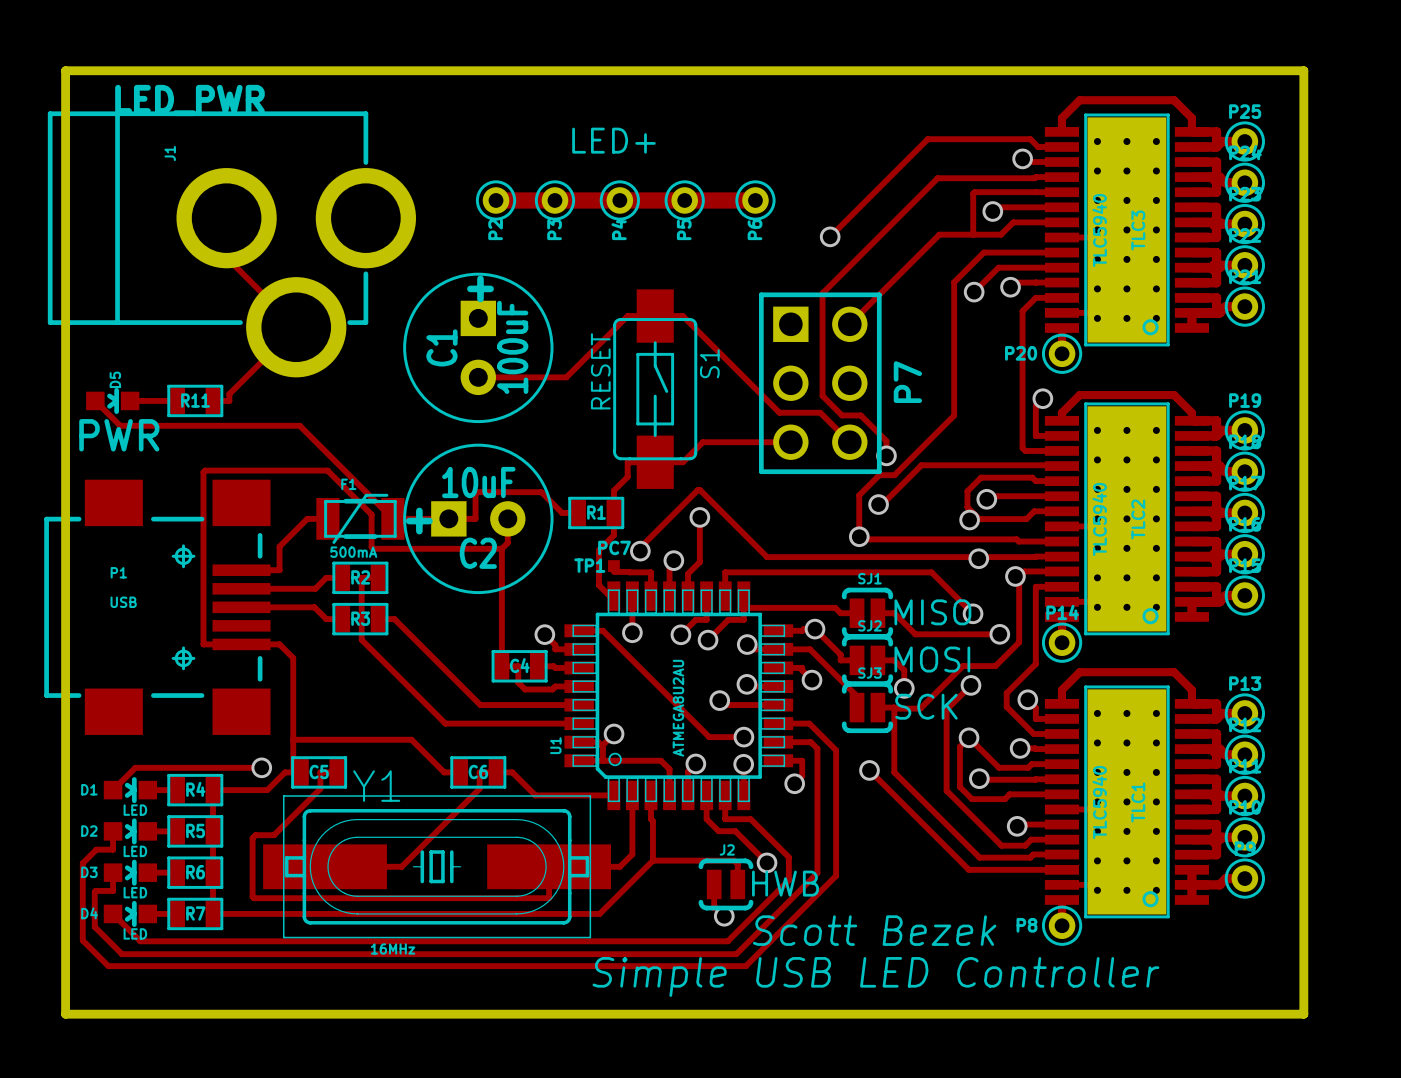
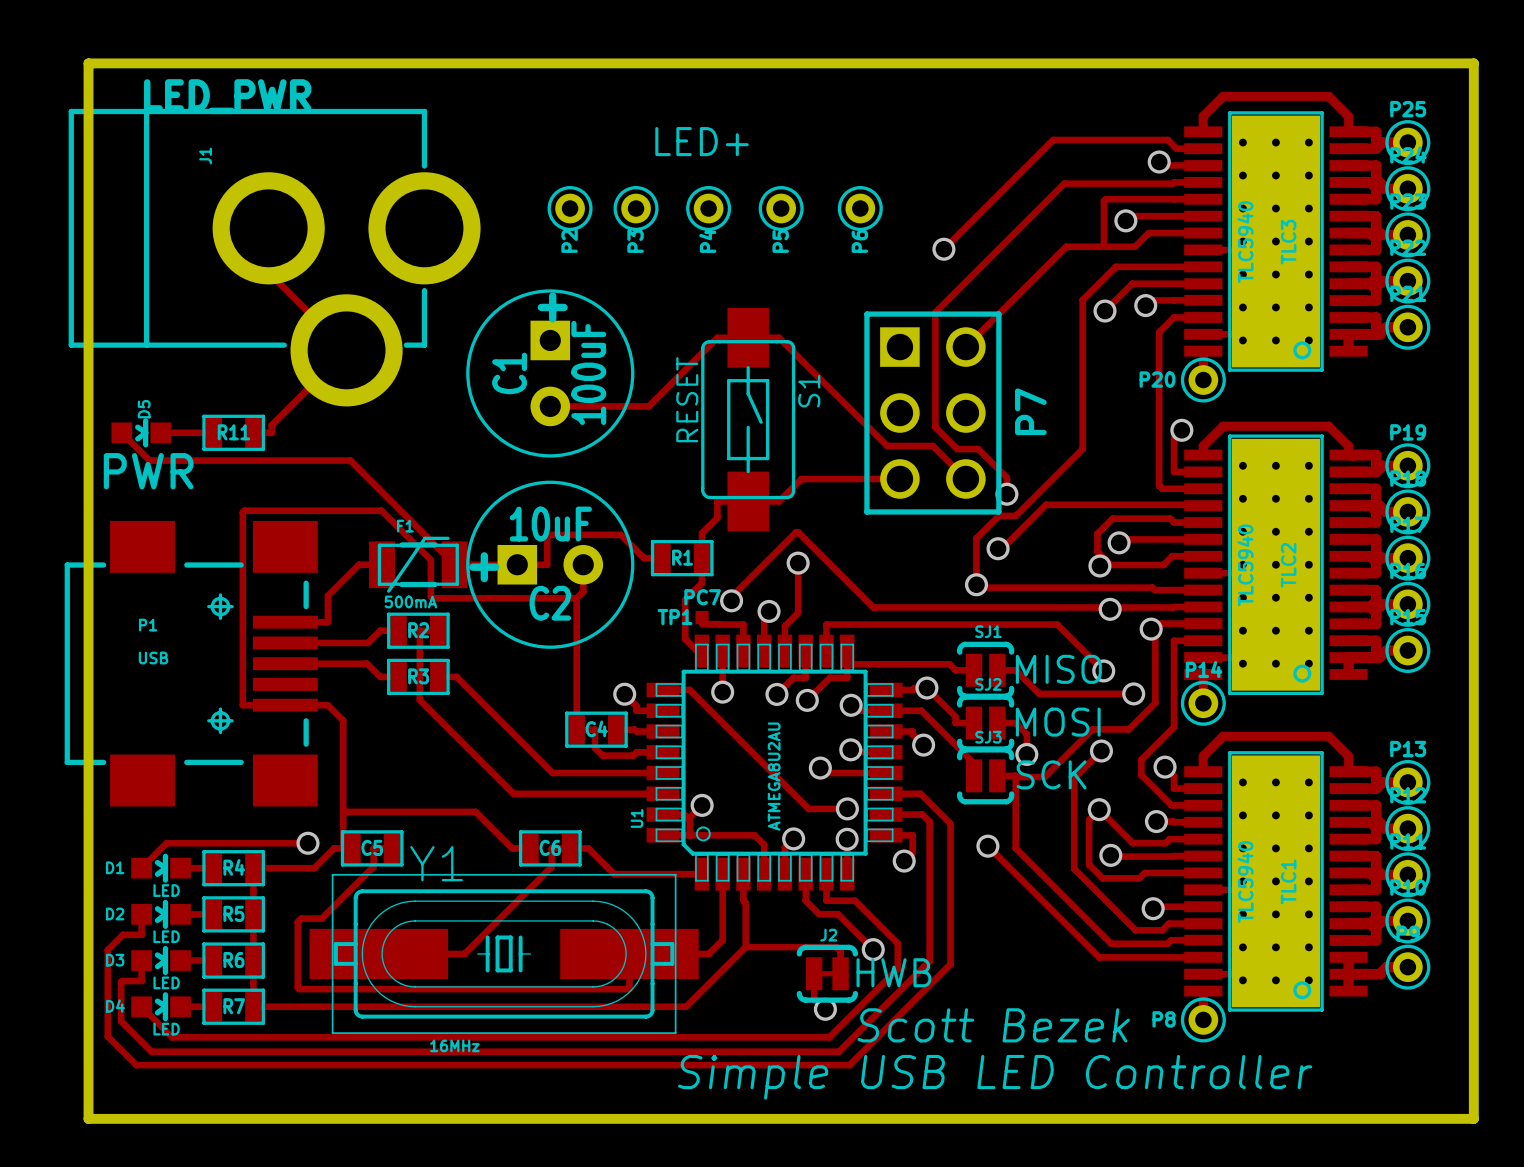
track: (496, 200) (755, 200) -> none
J2 footprint: [698, 858, 754, 911] -> [796, 944, 859, 1003]

